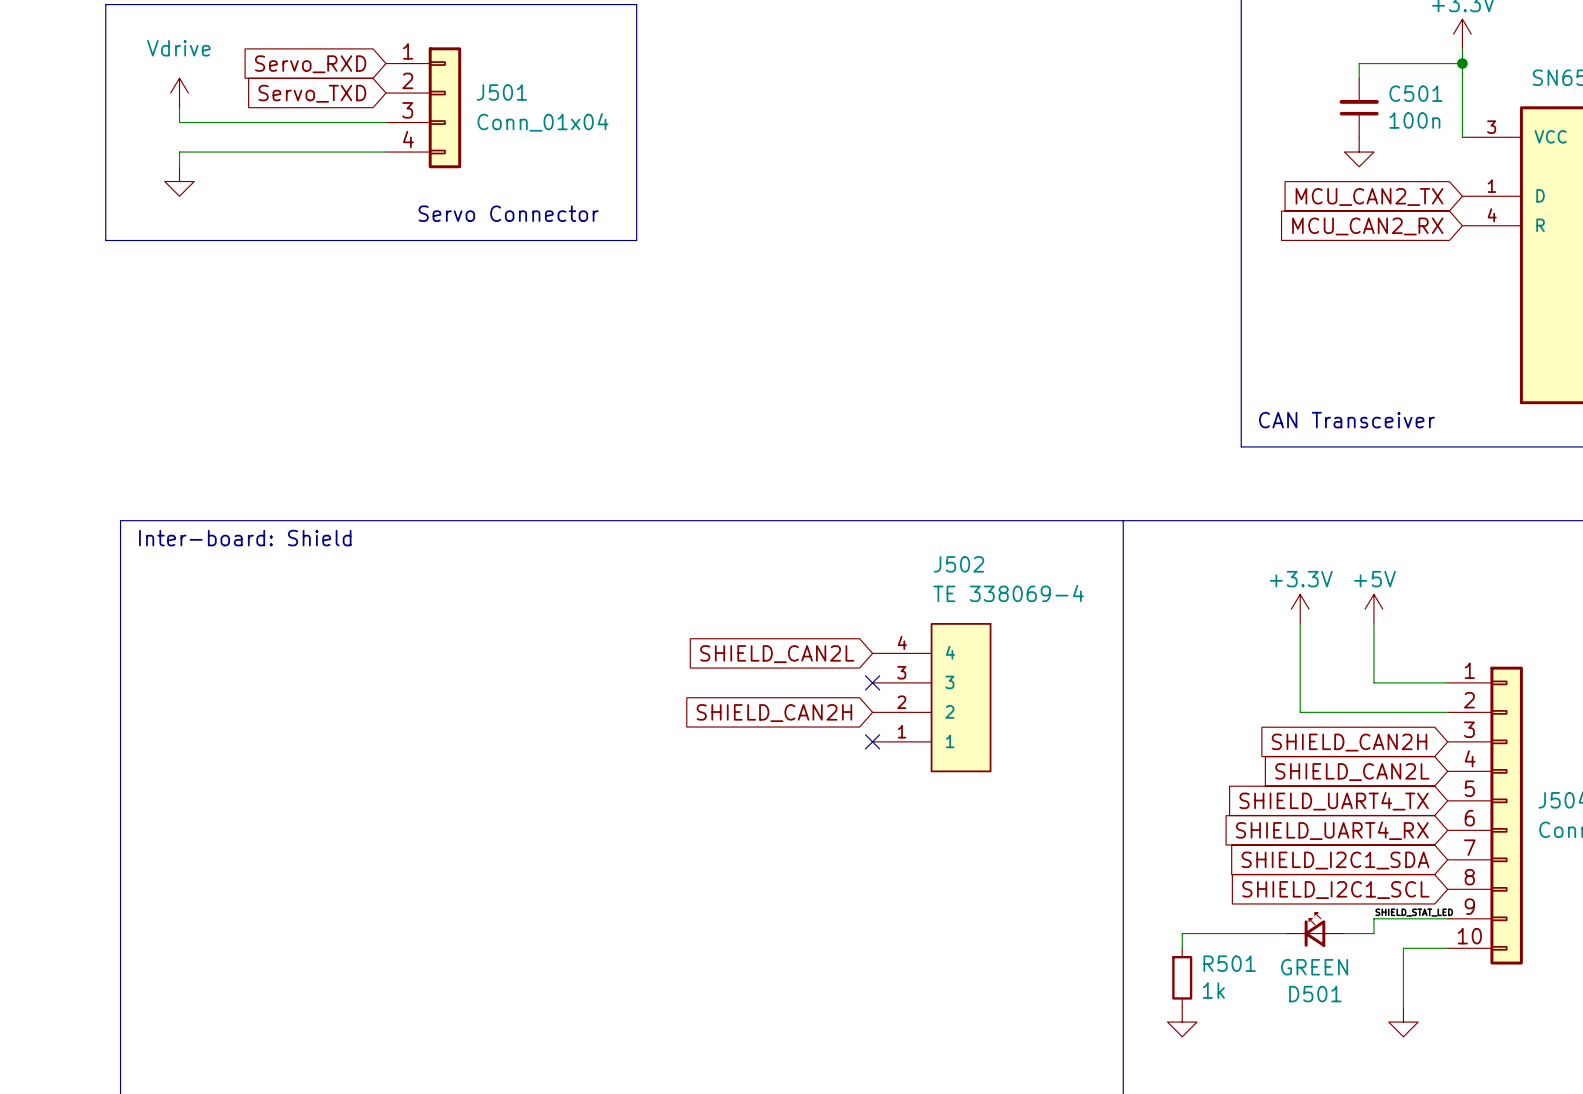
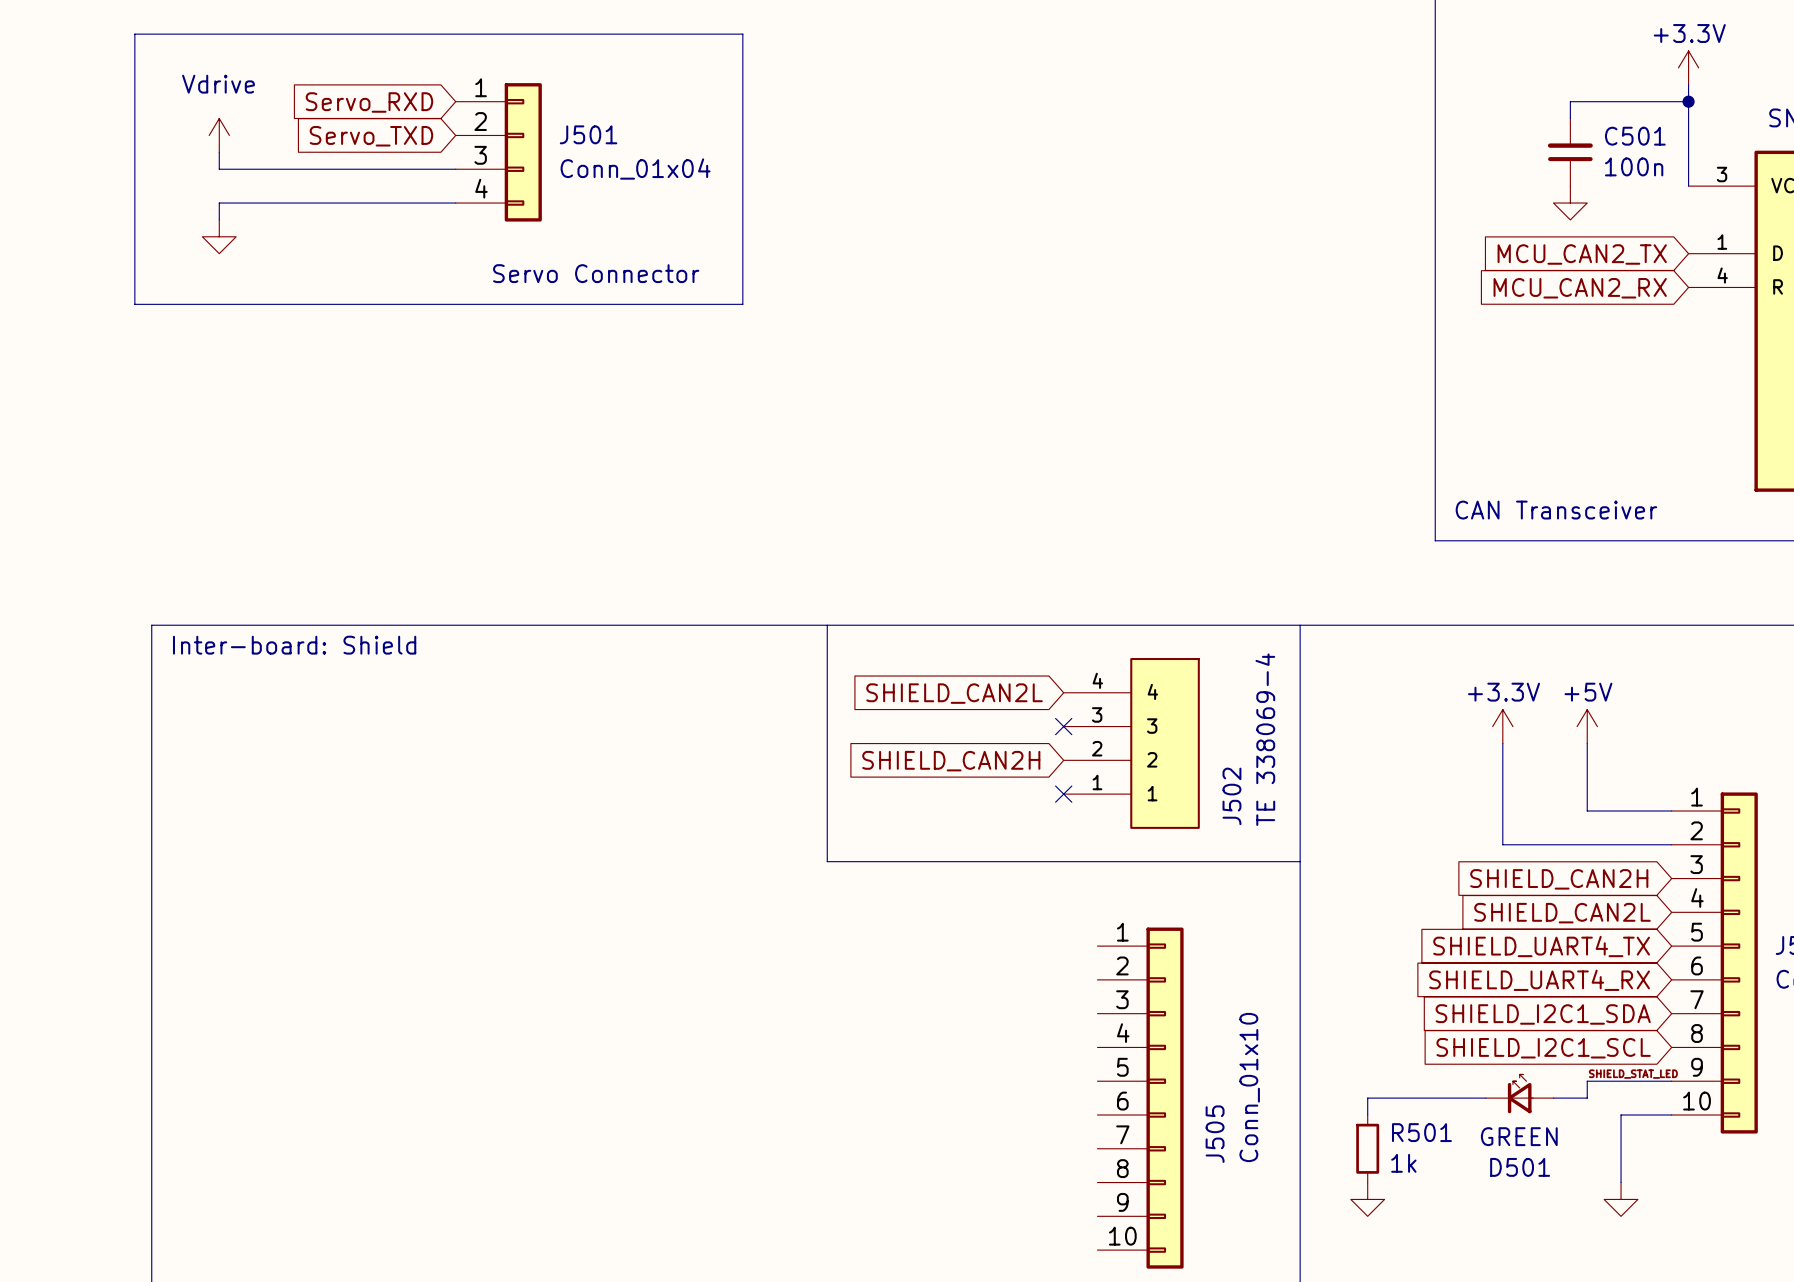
line: none -> (827, 625) (827, 861) (1300, 861)
J502 name rotation: 0° (959, 564) -> 90° counterclockwise (1231, 796)
J502 name position: J502 (959, 564) -> J502 (1231, 796)
J502 value rotation: 0° (1008, 593) -> 90° counterclockwise (1265, 739)
no-connect mark: none -> (1063, 726)
global label position: SHIELD_CAN2L (777, 654) -> SHIELD_CAN2L (954, 693)
no-connect mark: none -> (1063, 794)
no-connect mark: (872, 682) -> none
J502 position: (932, 697) -> (1131, 743)
global label position: SHIELD_CAN2H (774, 713) -> SHIELD_CAN2H (951, 761)
no-connect mark: (872, 741) -> none
J505: none -> Conn_01x10 (1140, 1098)

